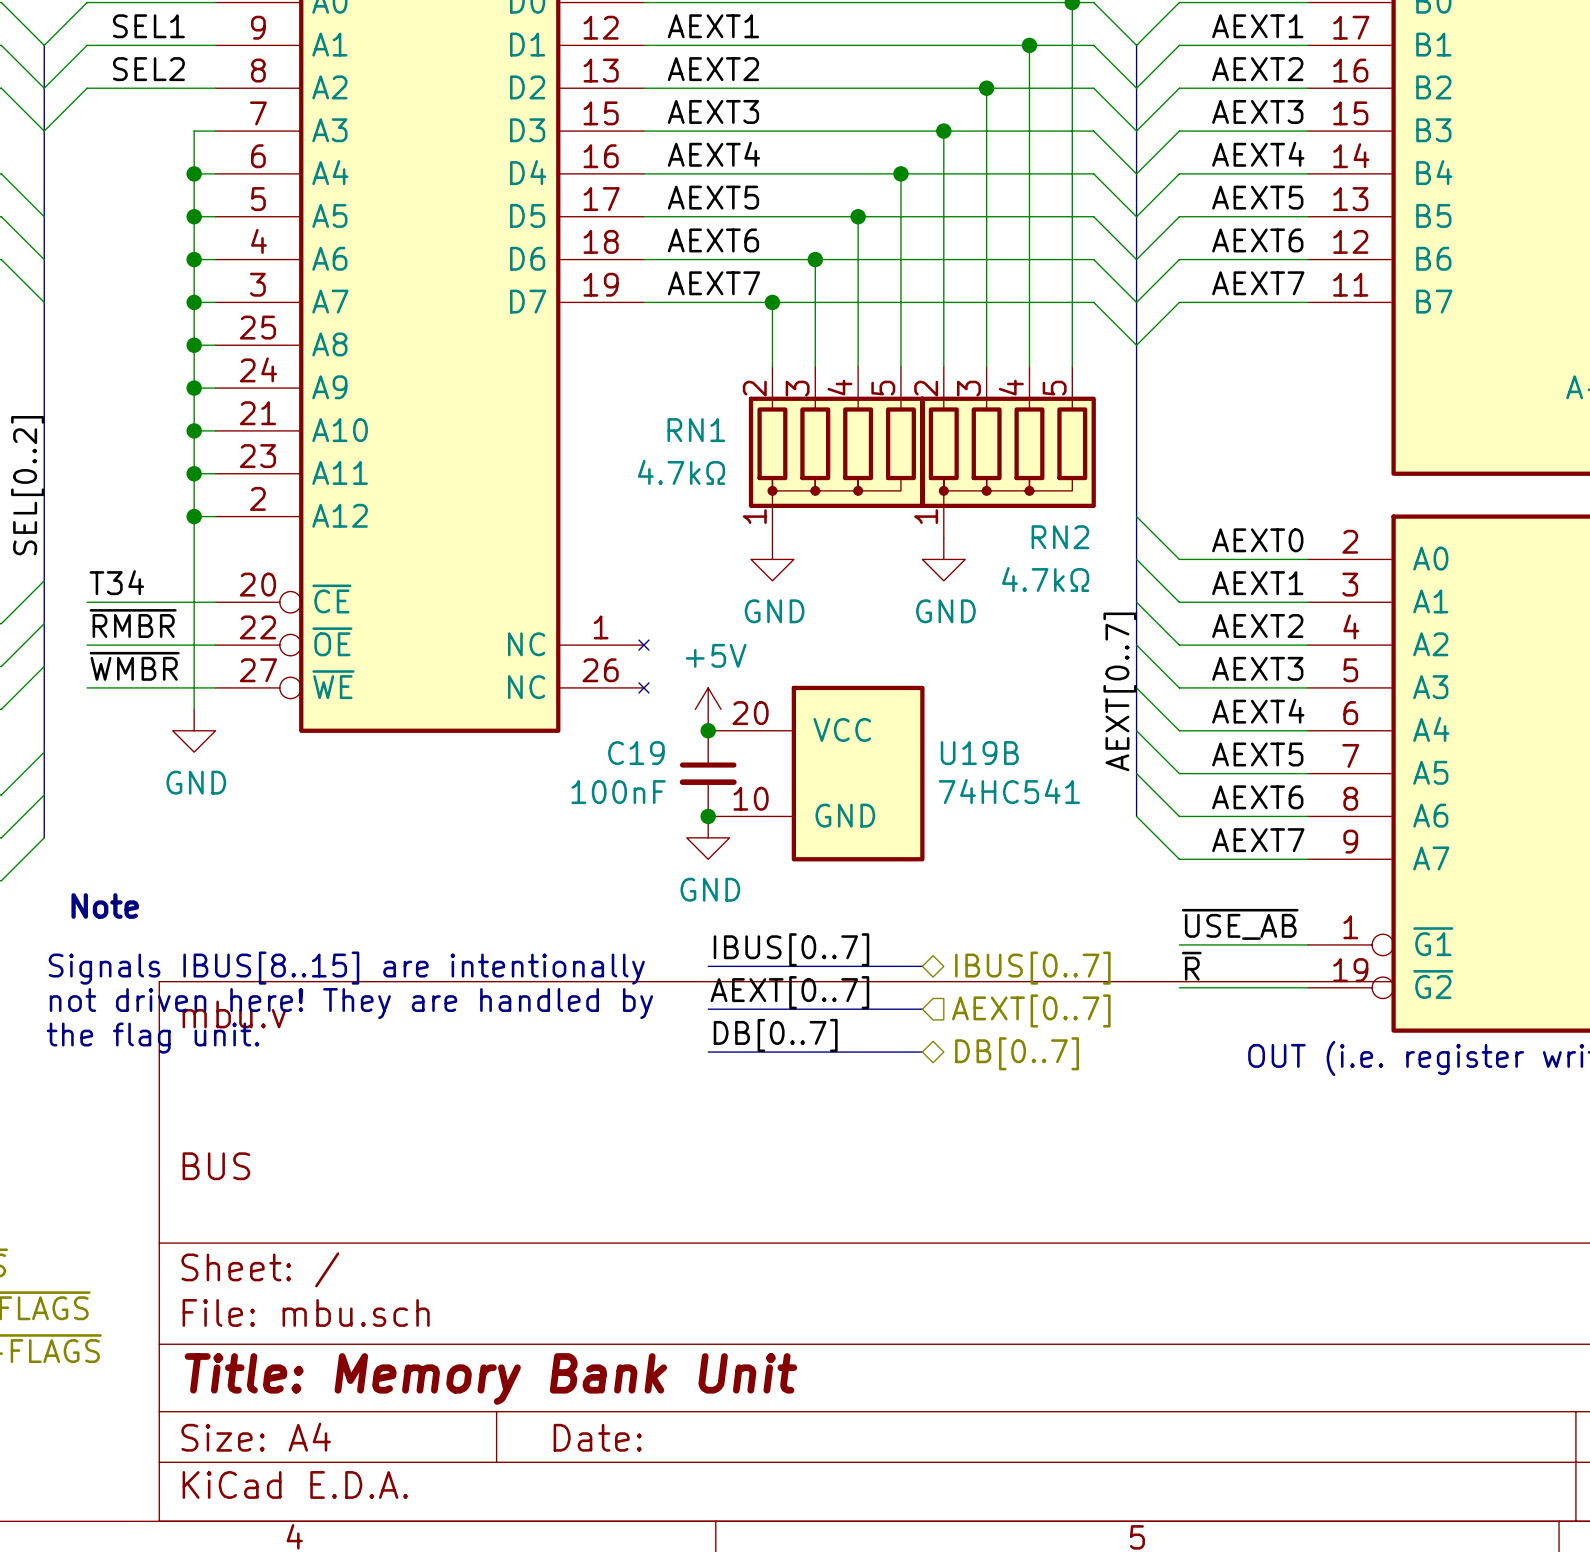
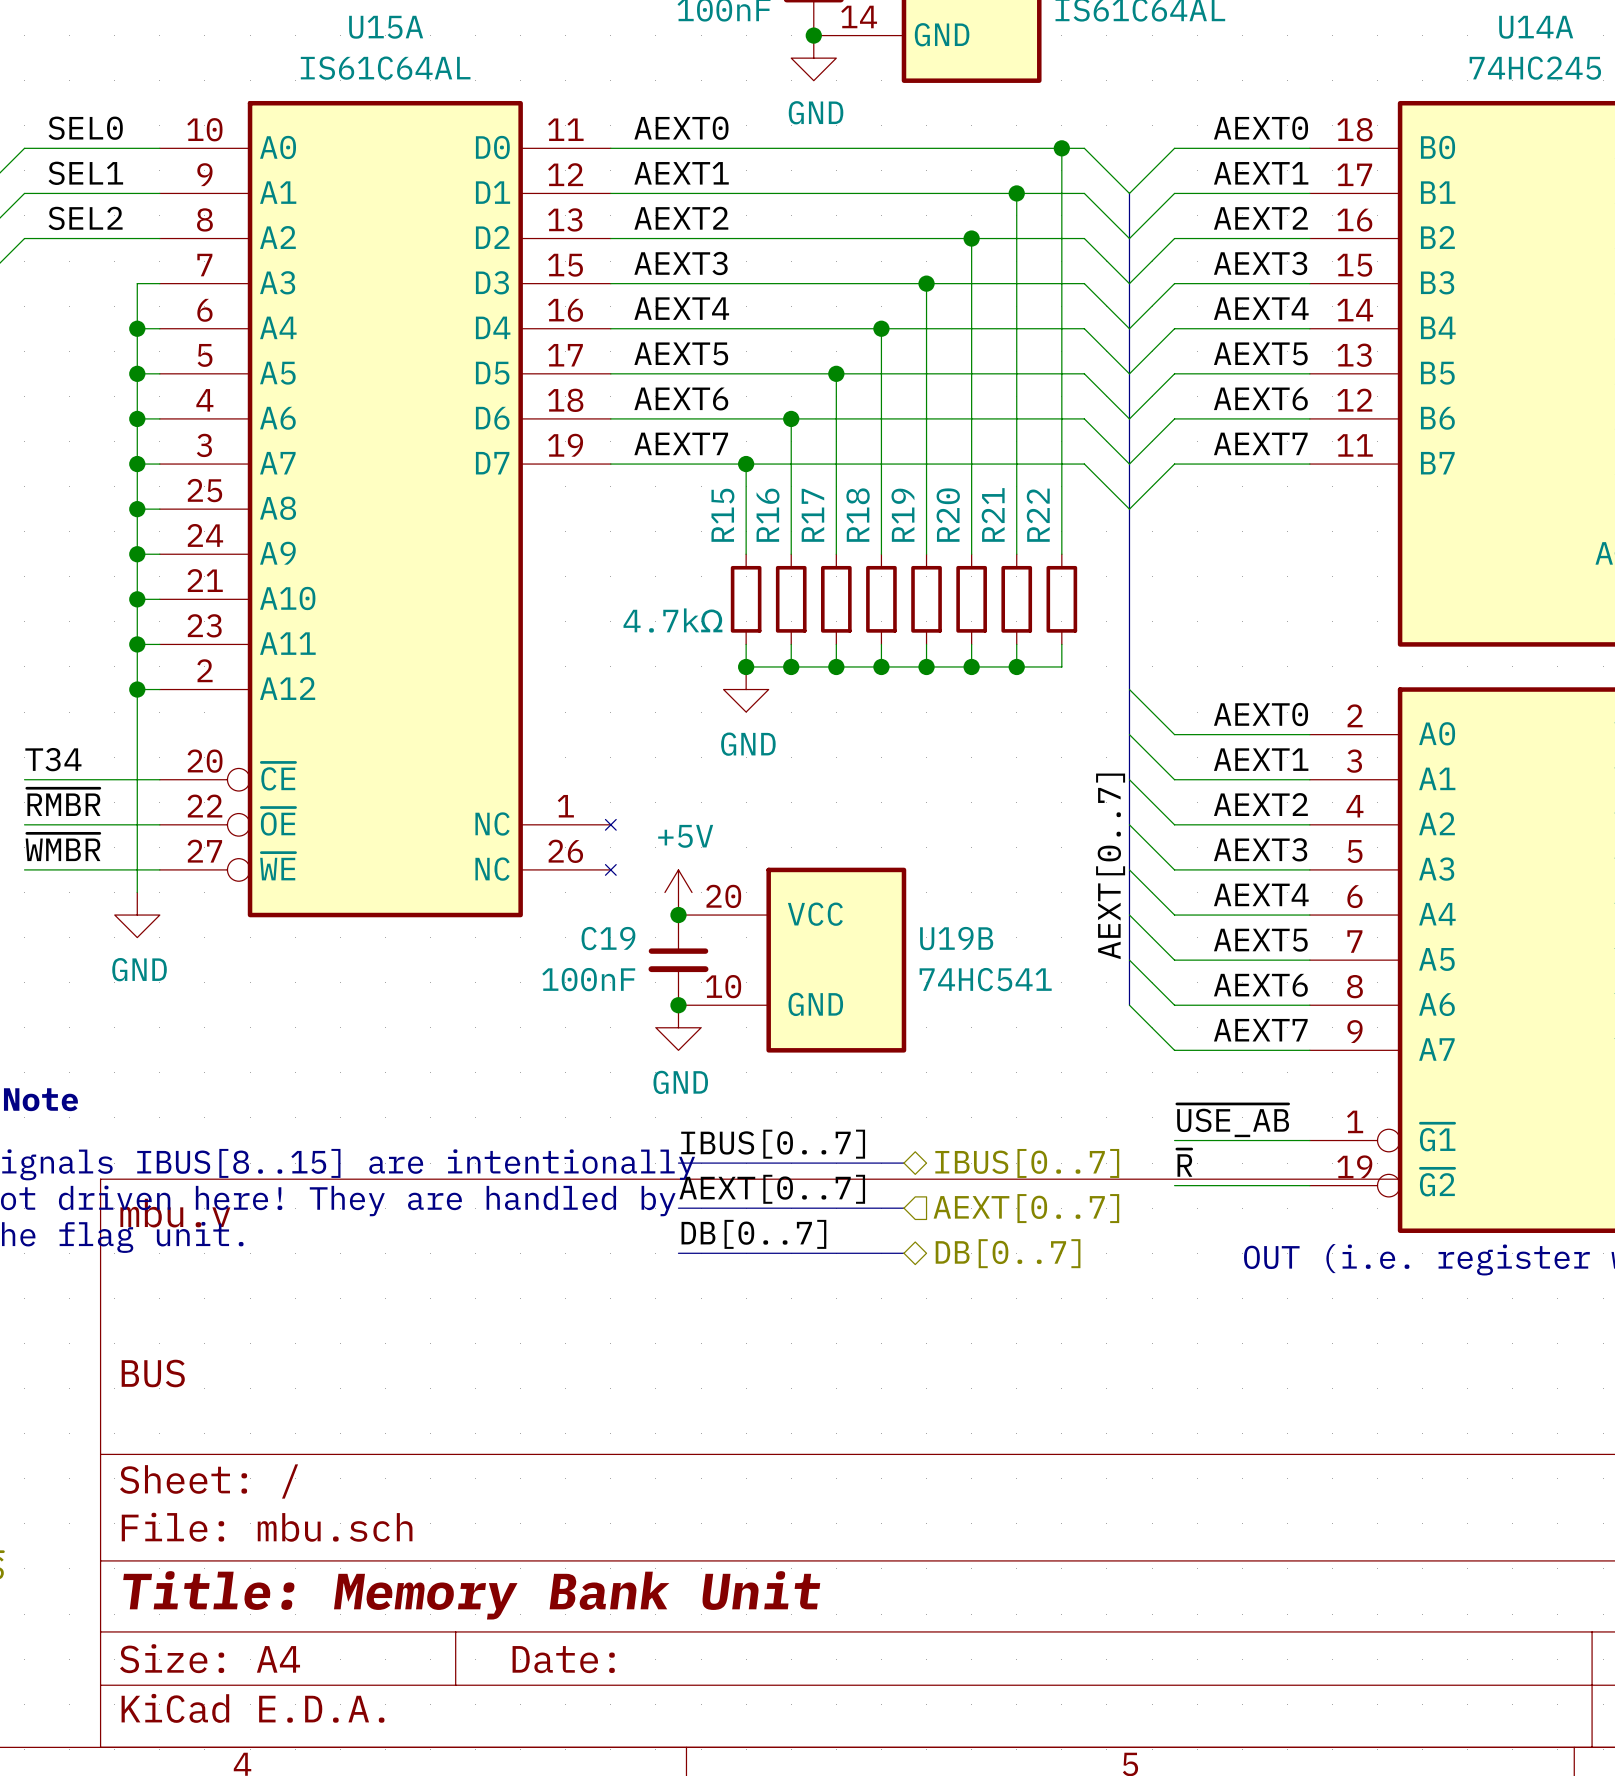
R15: none -> 4.7kΩ (746, 599)
R16: none -> (791, 599)
R17: none -> (836, 599)
R18: none -> (881, 599)
R19: none -> (926, 599)
R20: none -> (971, 599)
R21: none -> (1016, 599)
R22: none -> (1061, 599)
RN1: 4.7kΩ (836, 452) -> none
RN2: 4.7kΩ (1008, 452) -> none
junction: none -> (746, 666)
junction: none -> (791, 666)
junction: none -> (836, 666)
junction: none -> (881, 666)
junction: none -> (926, 666)
junction: none -> (971, 666)
junction: none -> (1016, 666)
power symbol position: GND (772, 559) -> GND (746, 689)
power symbol: GND (943, 559) -> none

